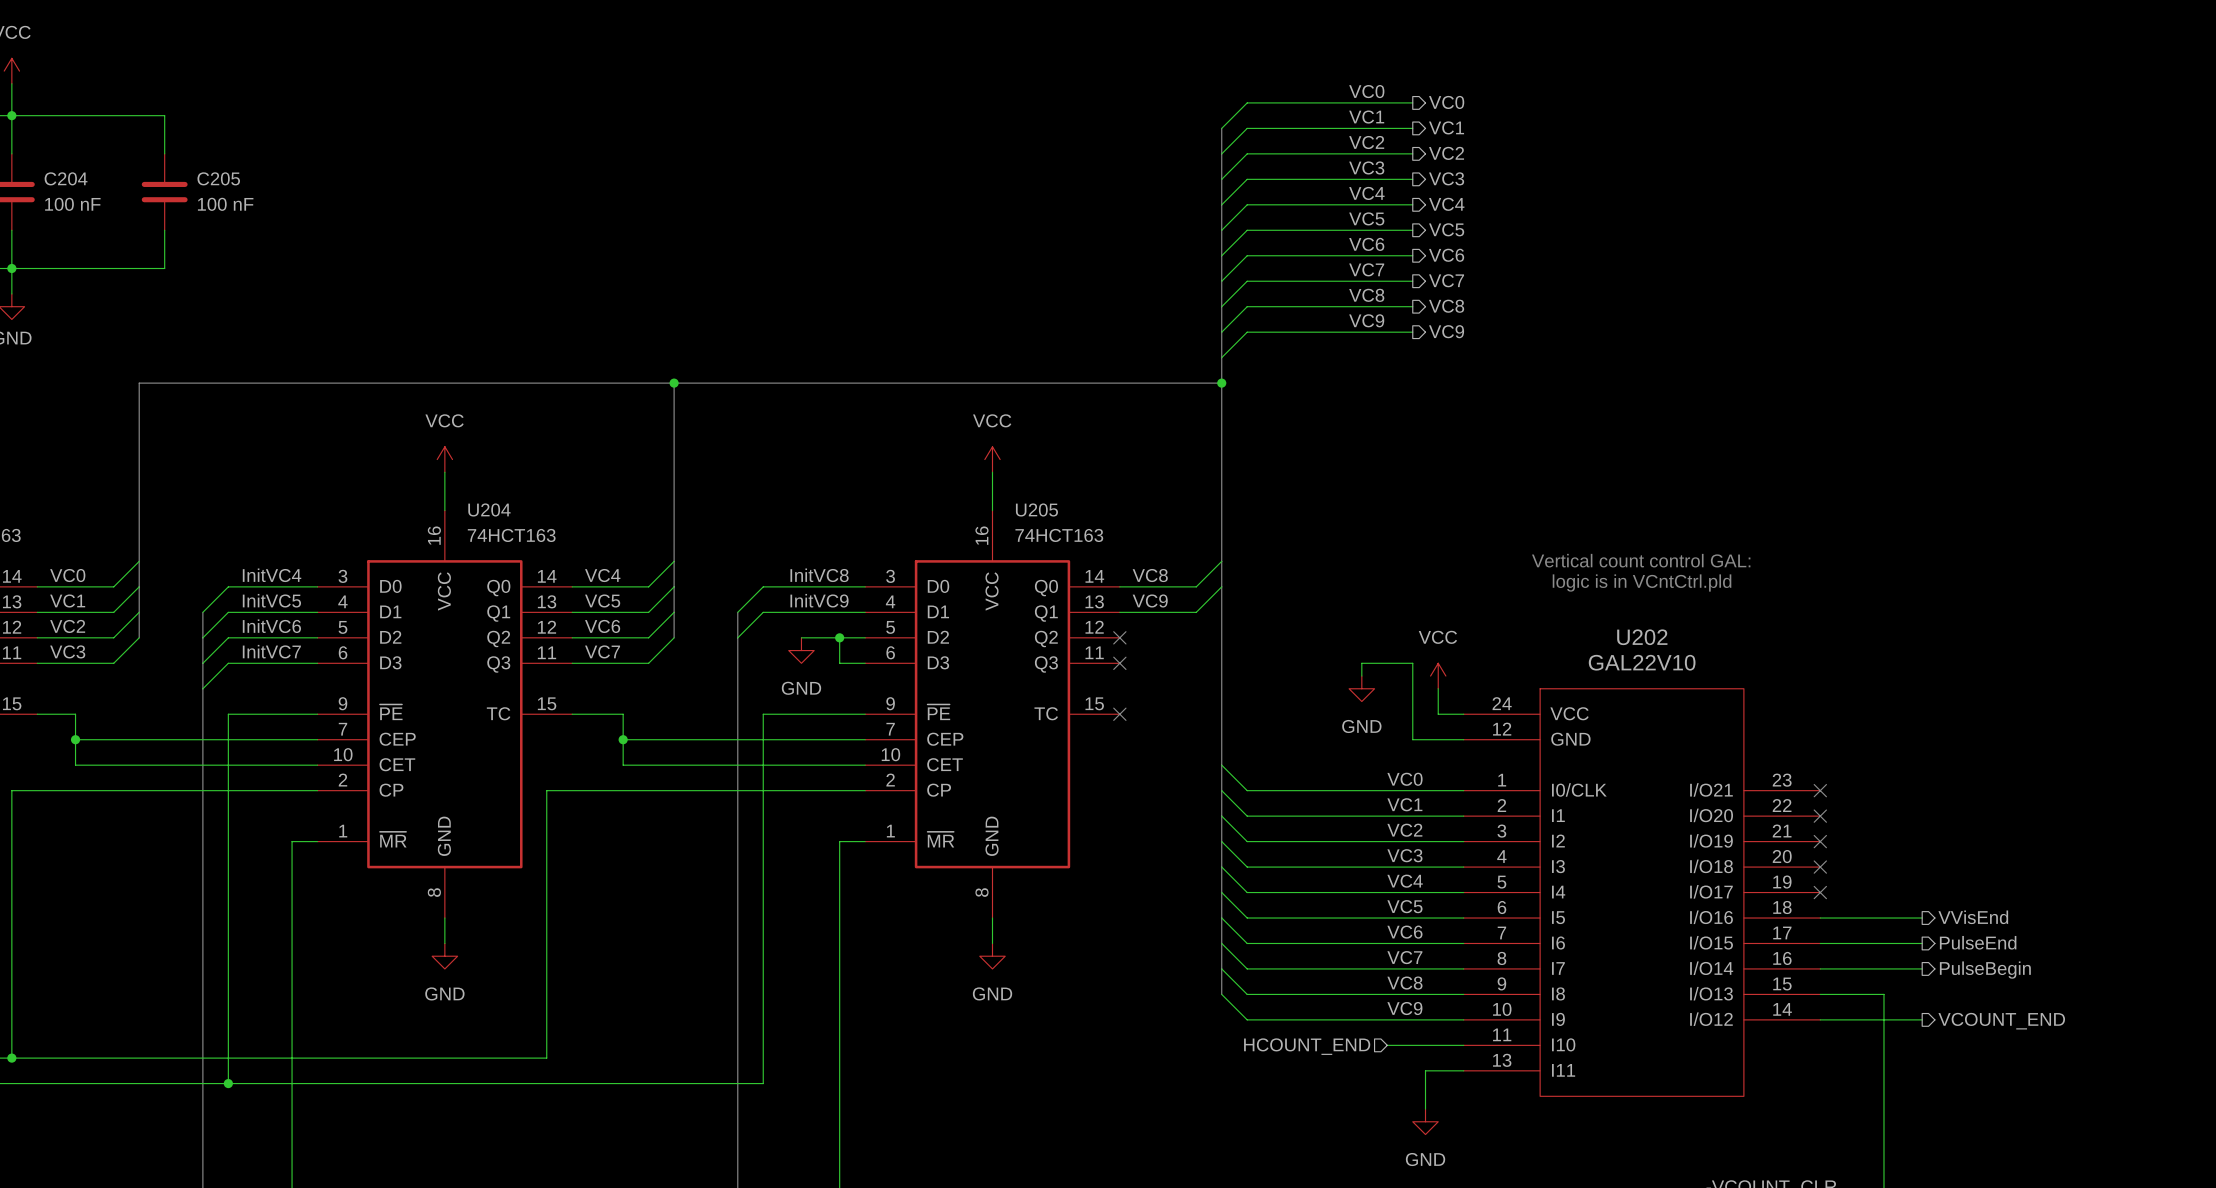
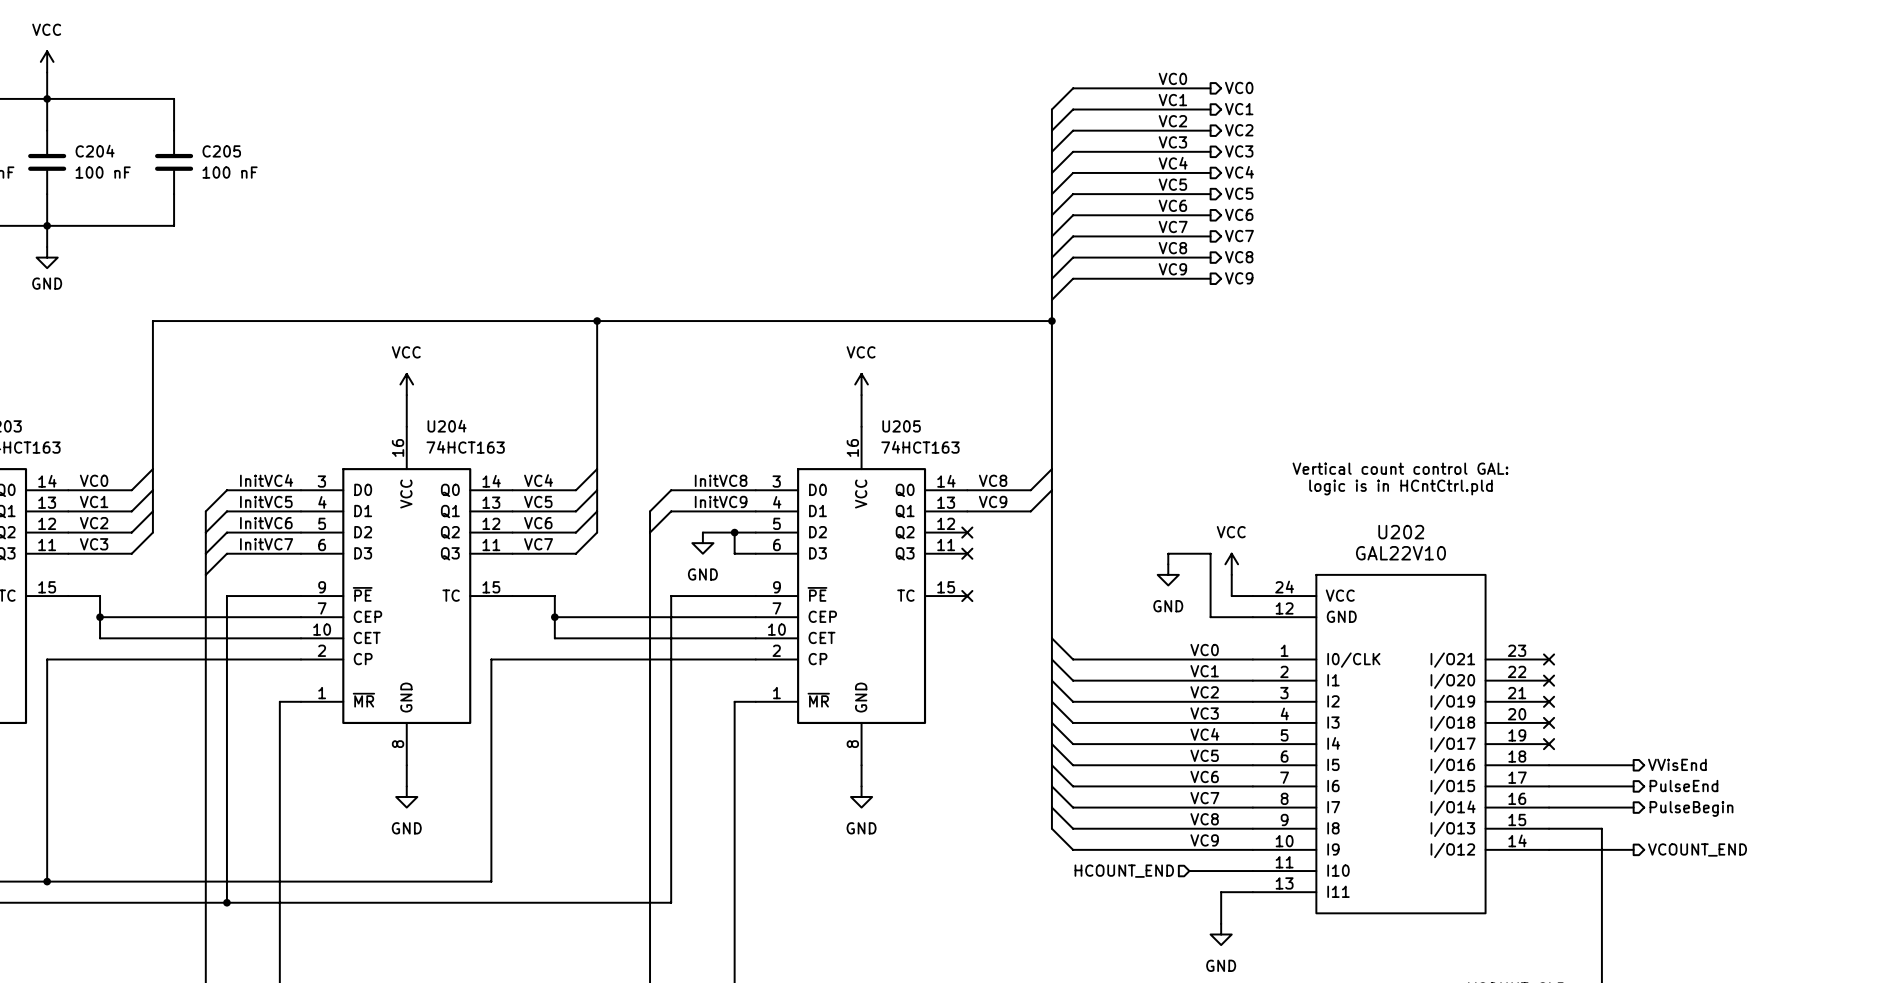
text: logic is in VCntCtrl.pld (1642, 583) -> logic is in HCntCtrl.pld (1400, 487)

